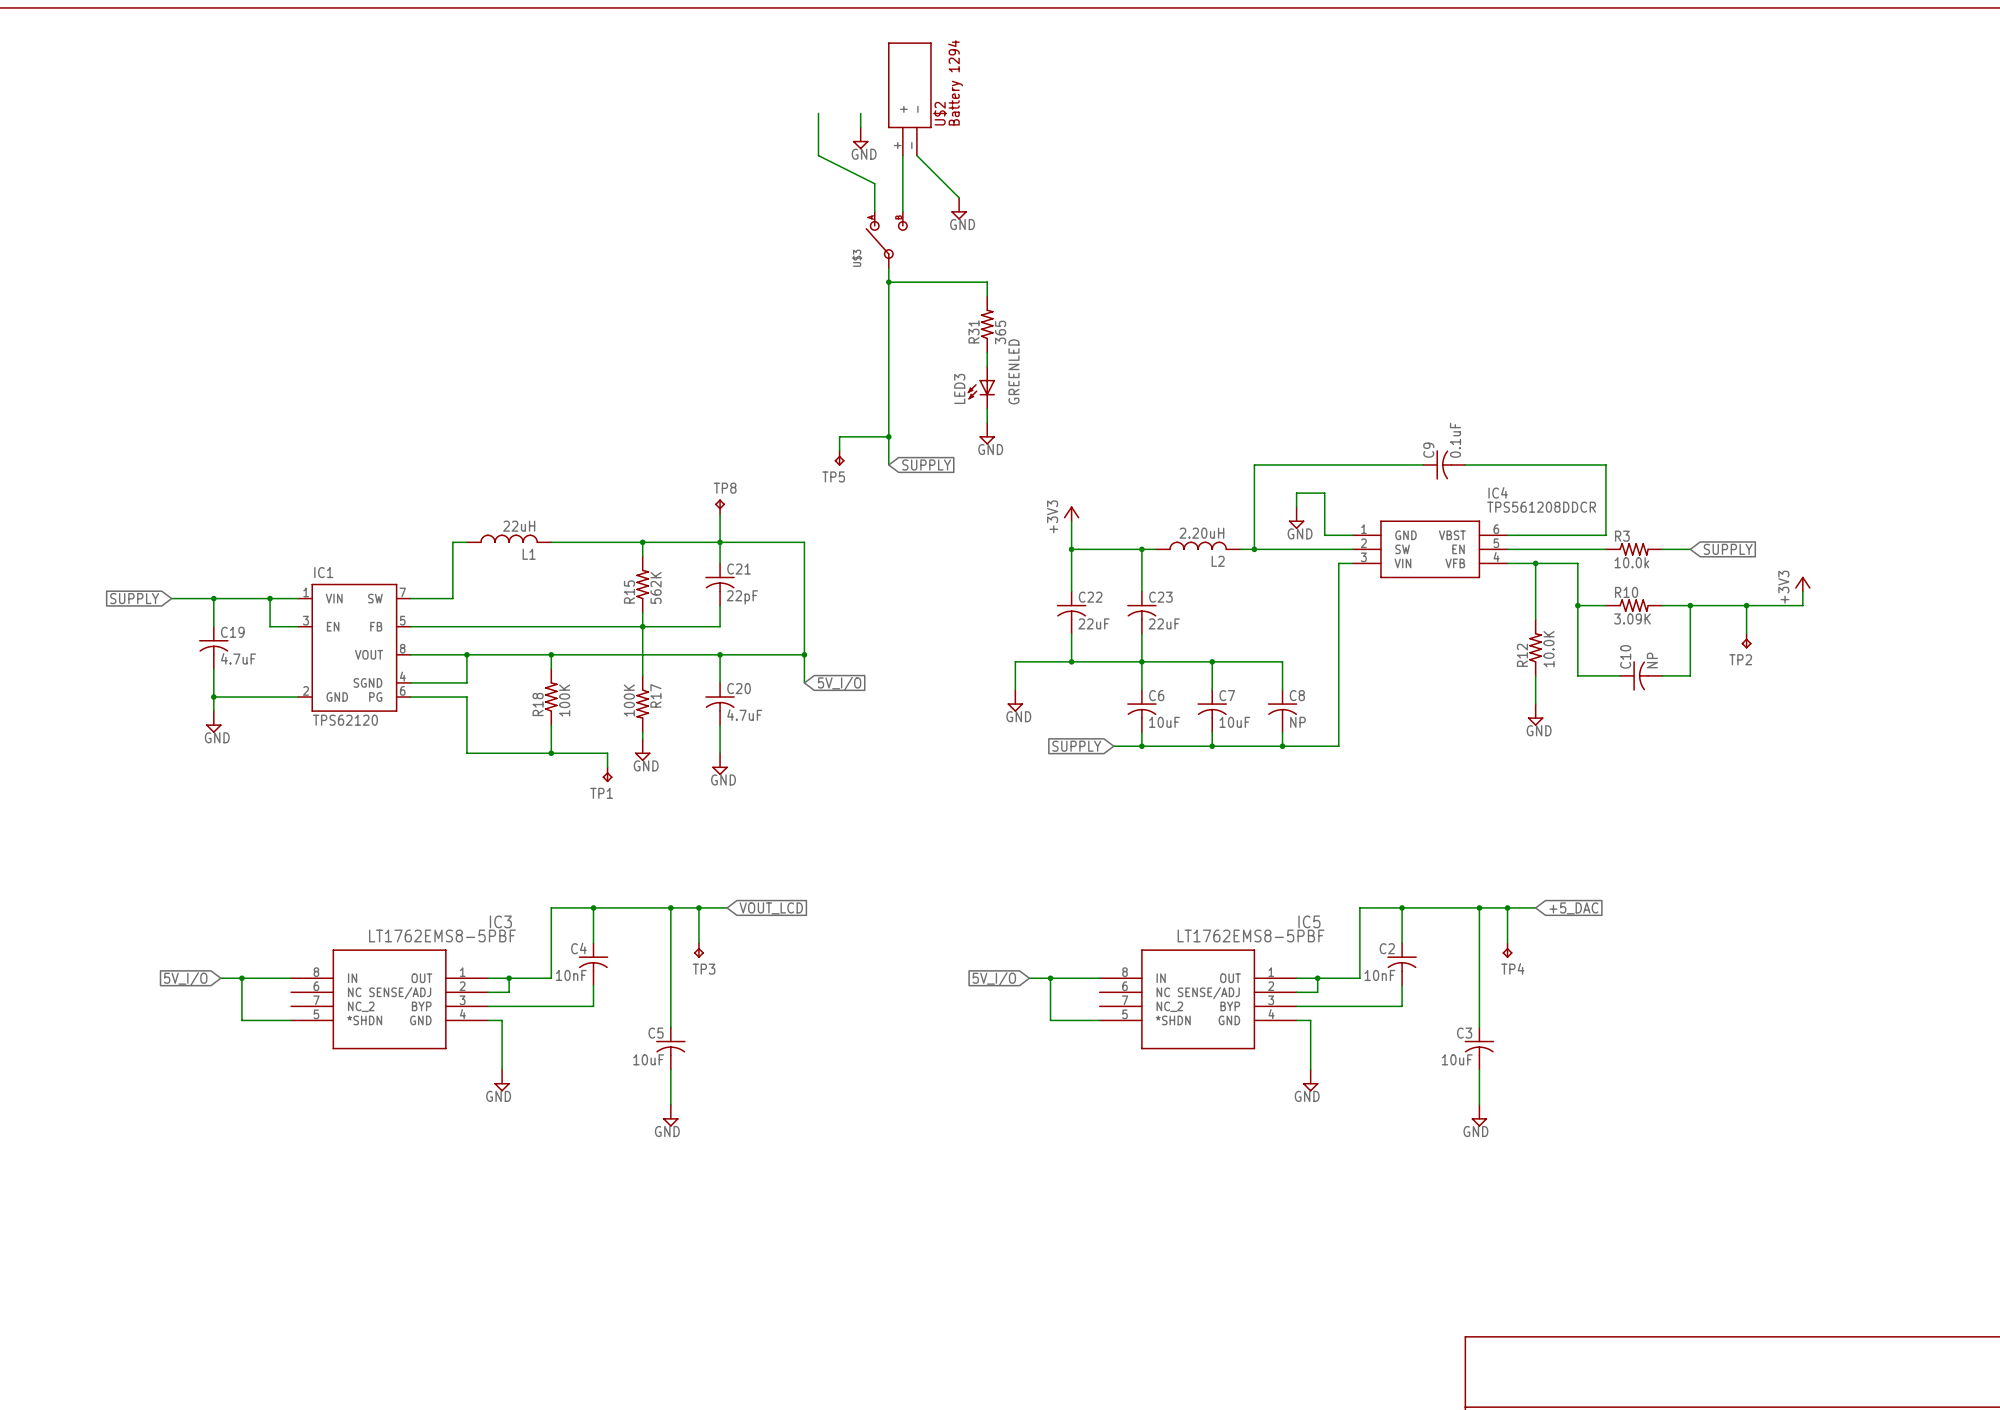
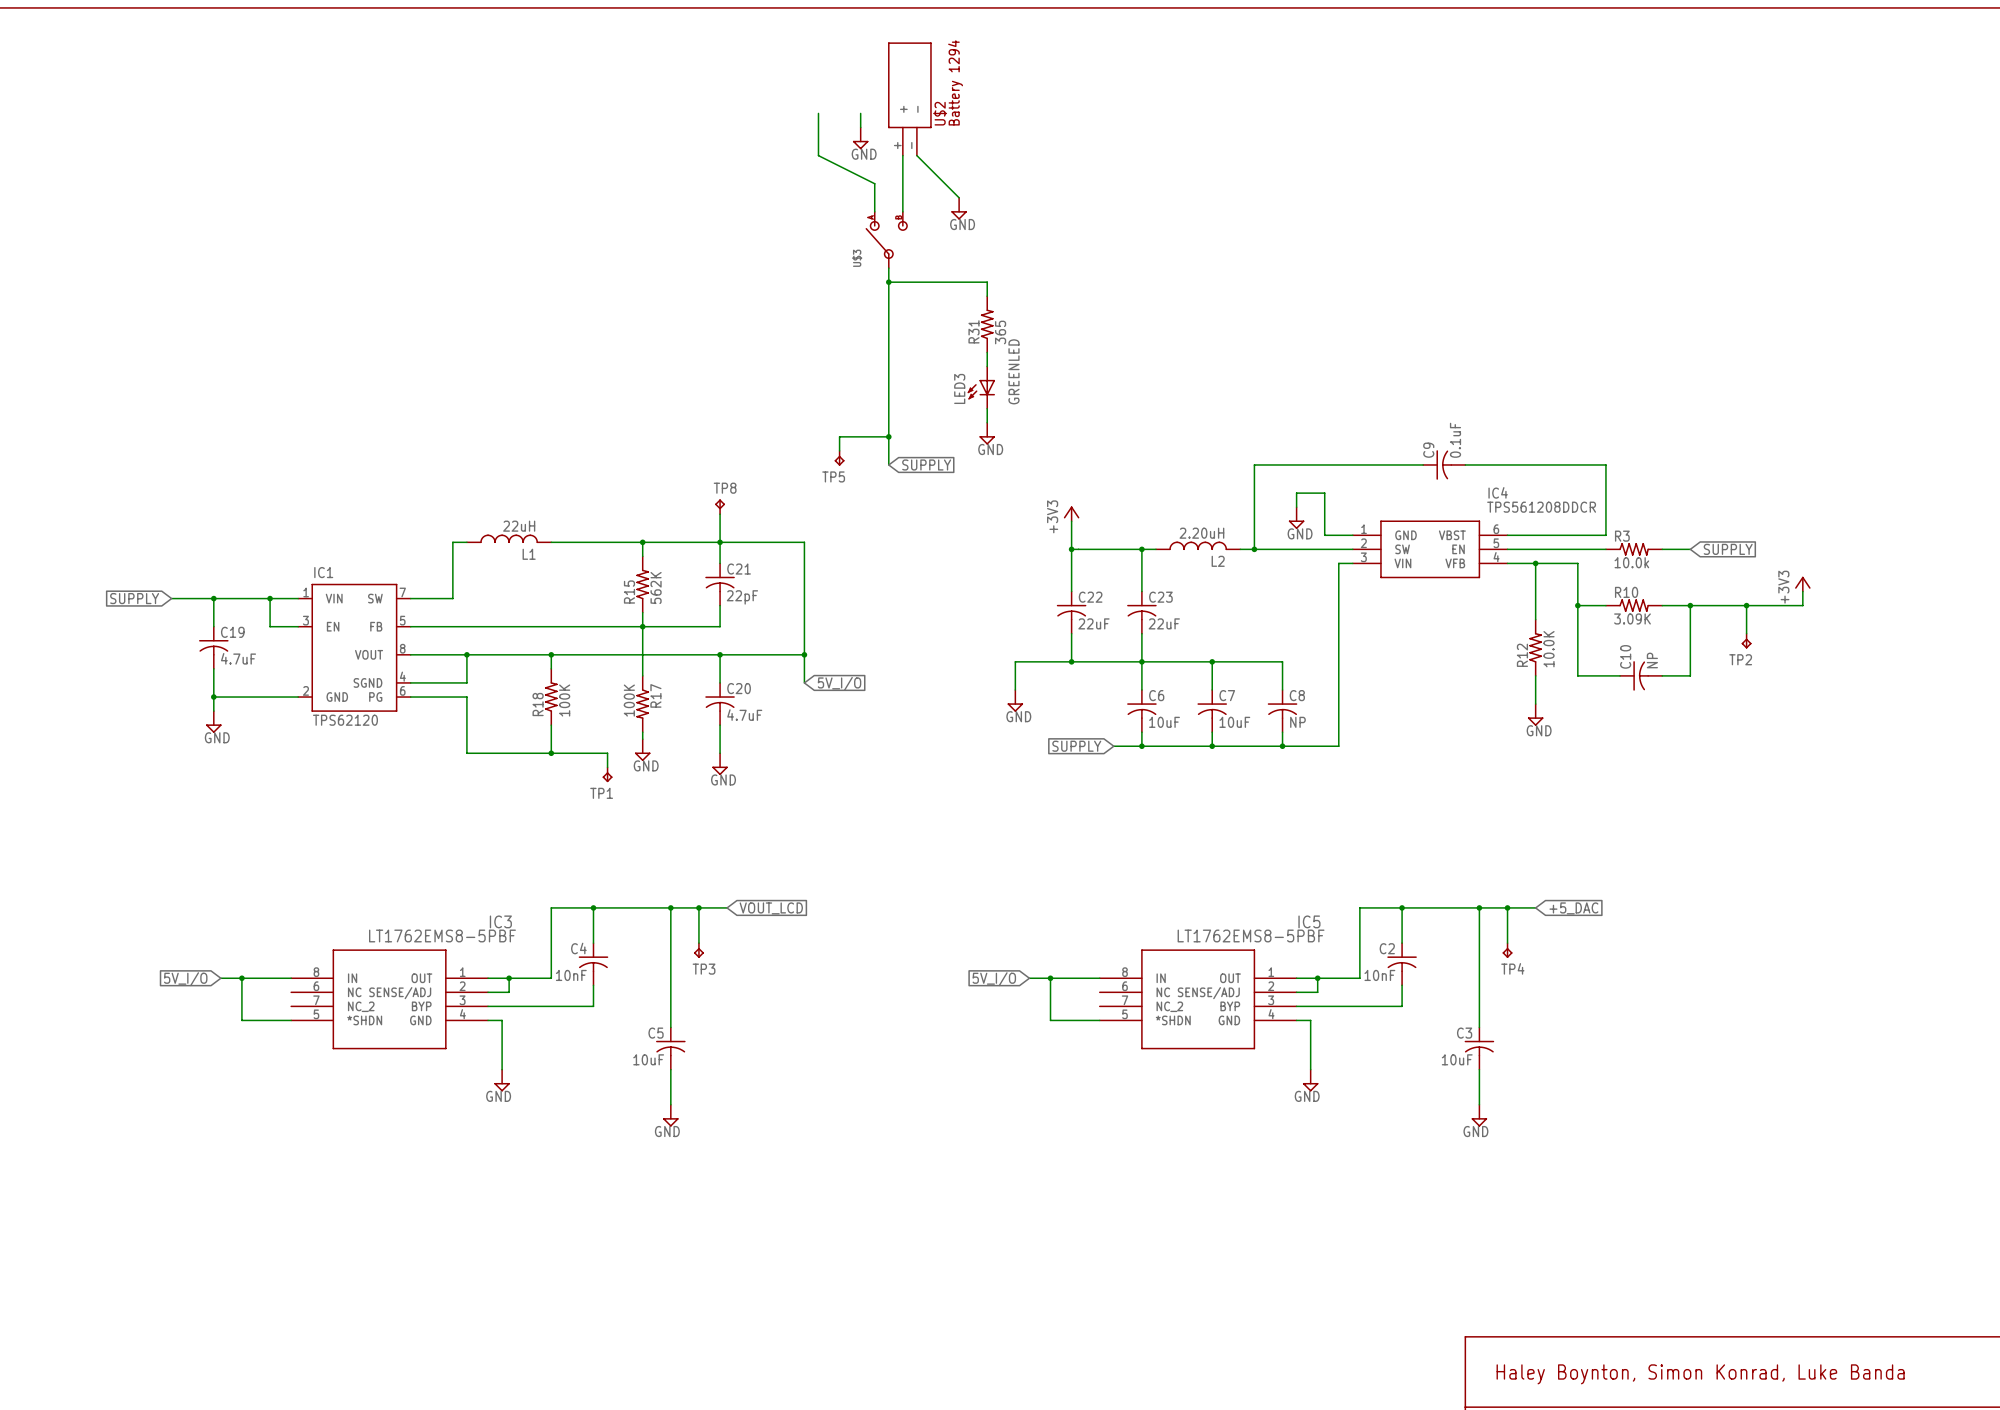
text: none -> Haley Boynton, Simon Konrad, Luke Banda (1700, 1374)

